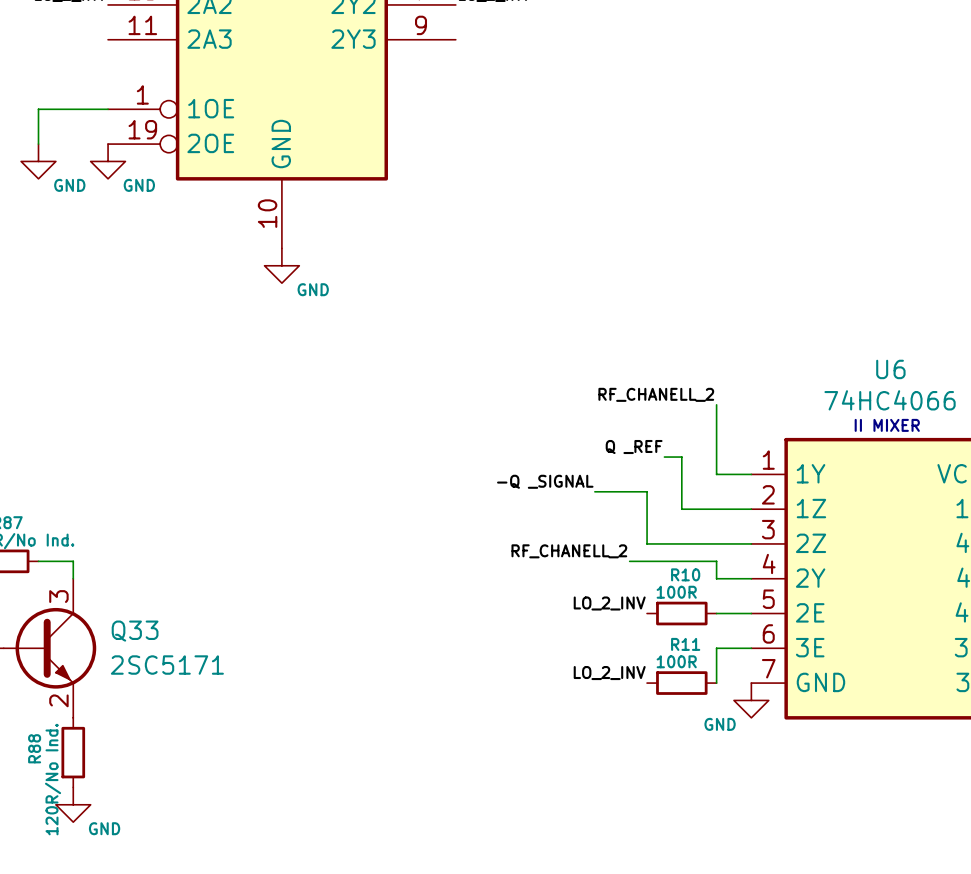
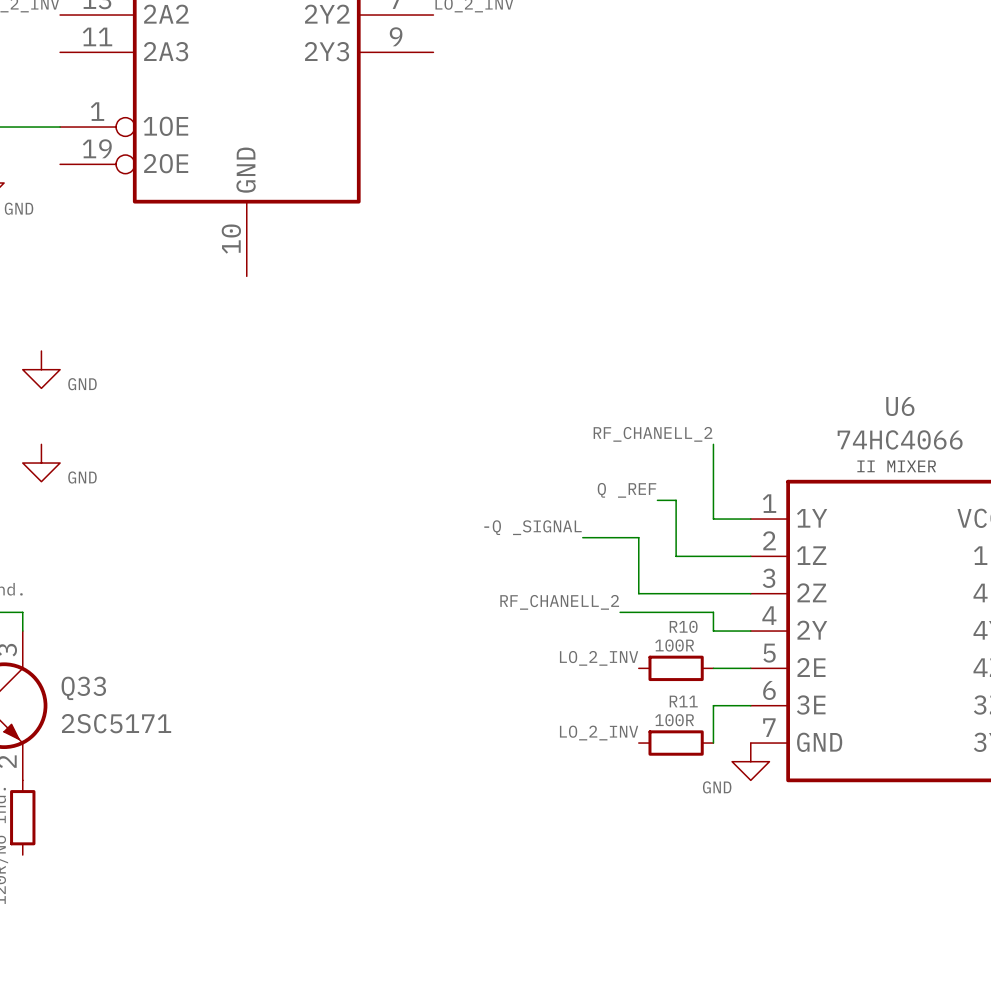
power symbol: GND (108, 161) -> none
power symbol: GND (281, 265) -> none
power symbol: none -> GND (41, 369)
power symbol: none -> GND (41, 463)
power symbol: GND (73, 804) -> none

